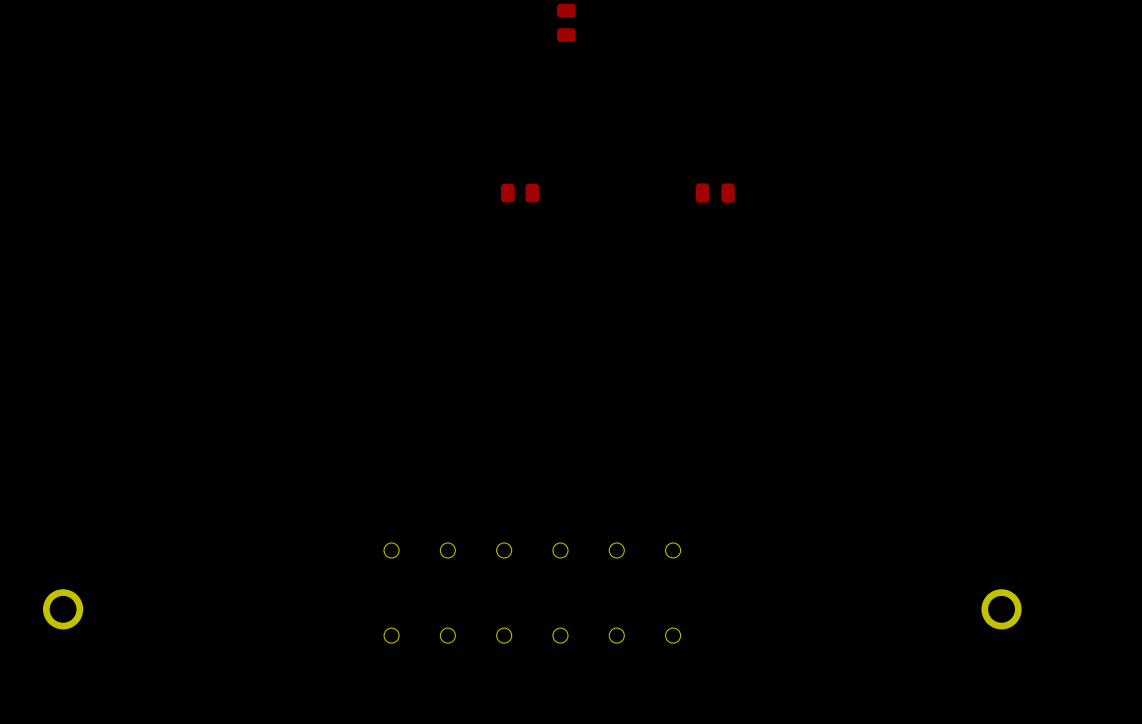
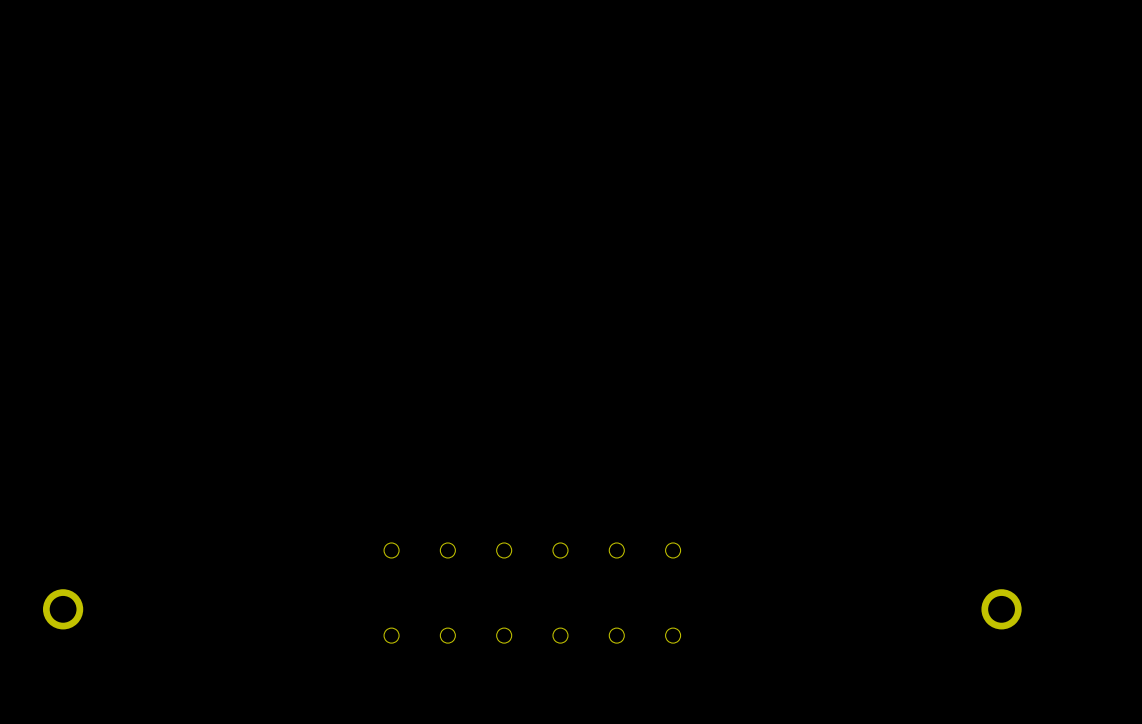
part: (566, 22) -> none
part: (520, 193) -> none
part: (715, 193) -> none

